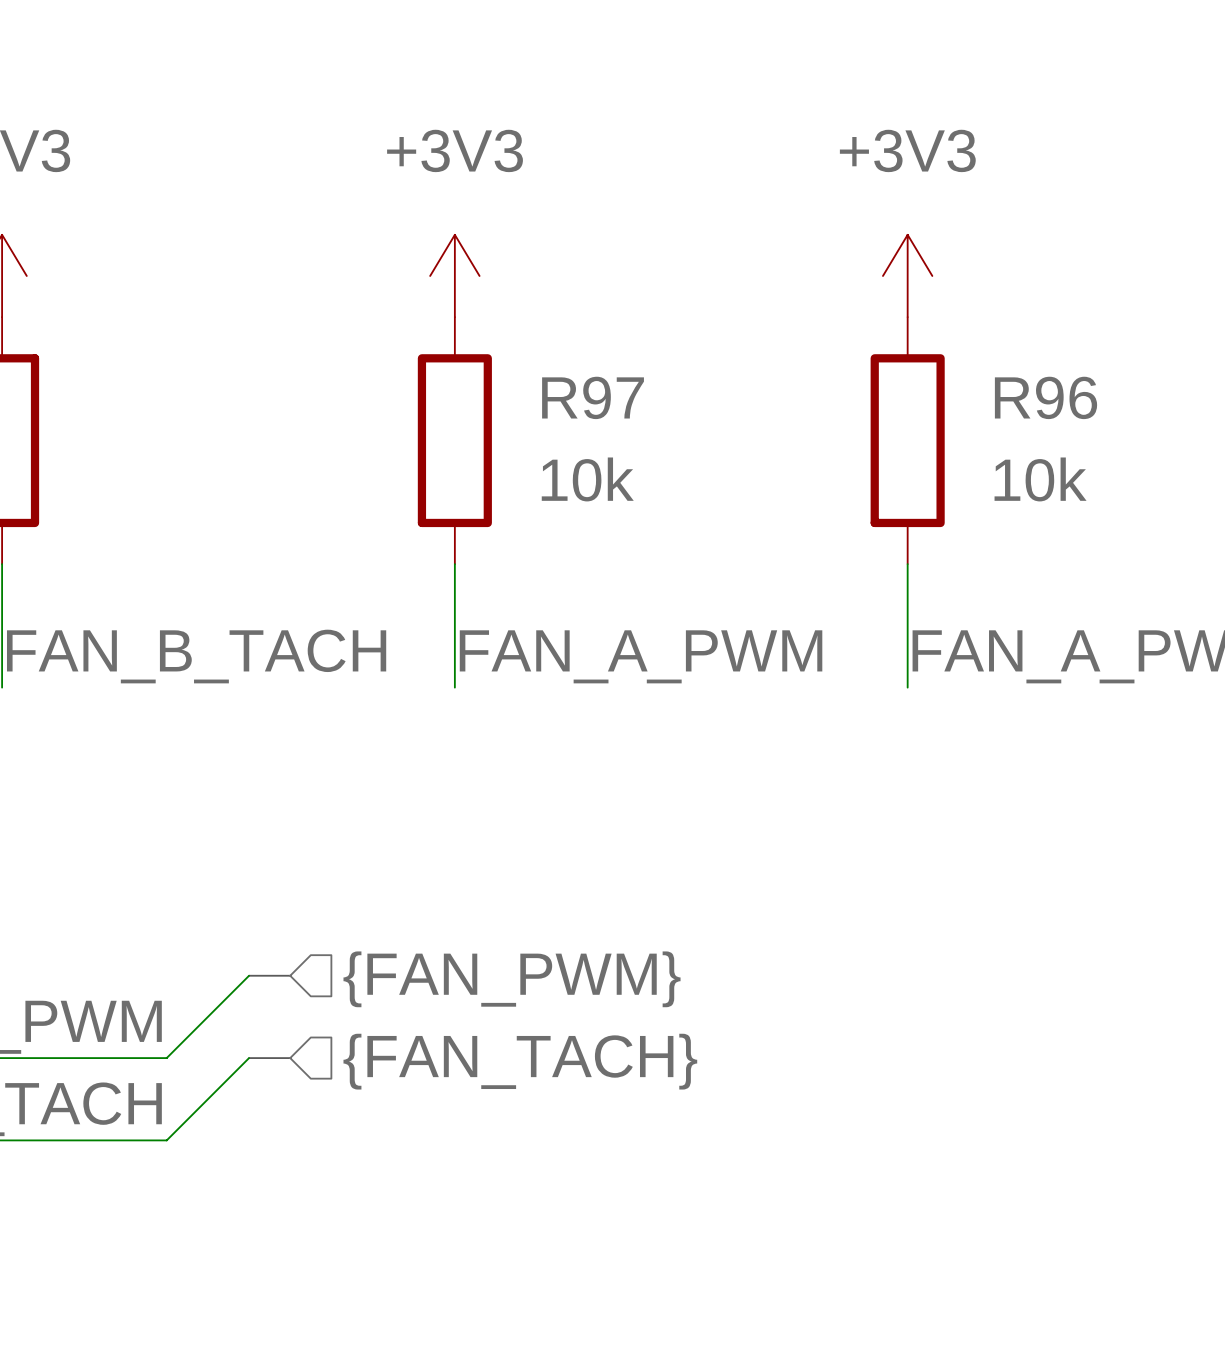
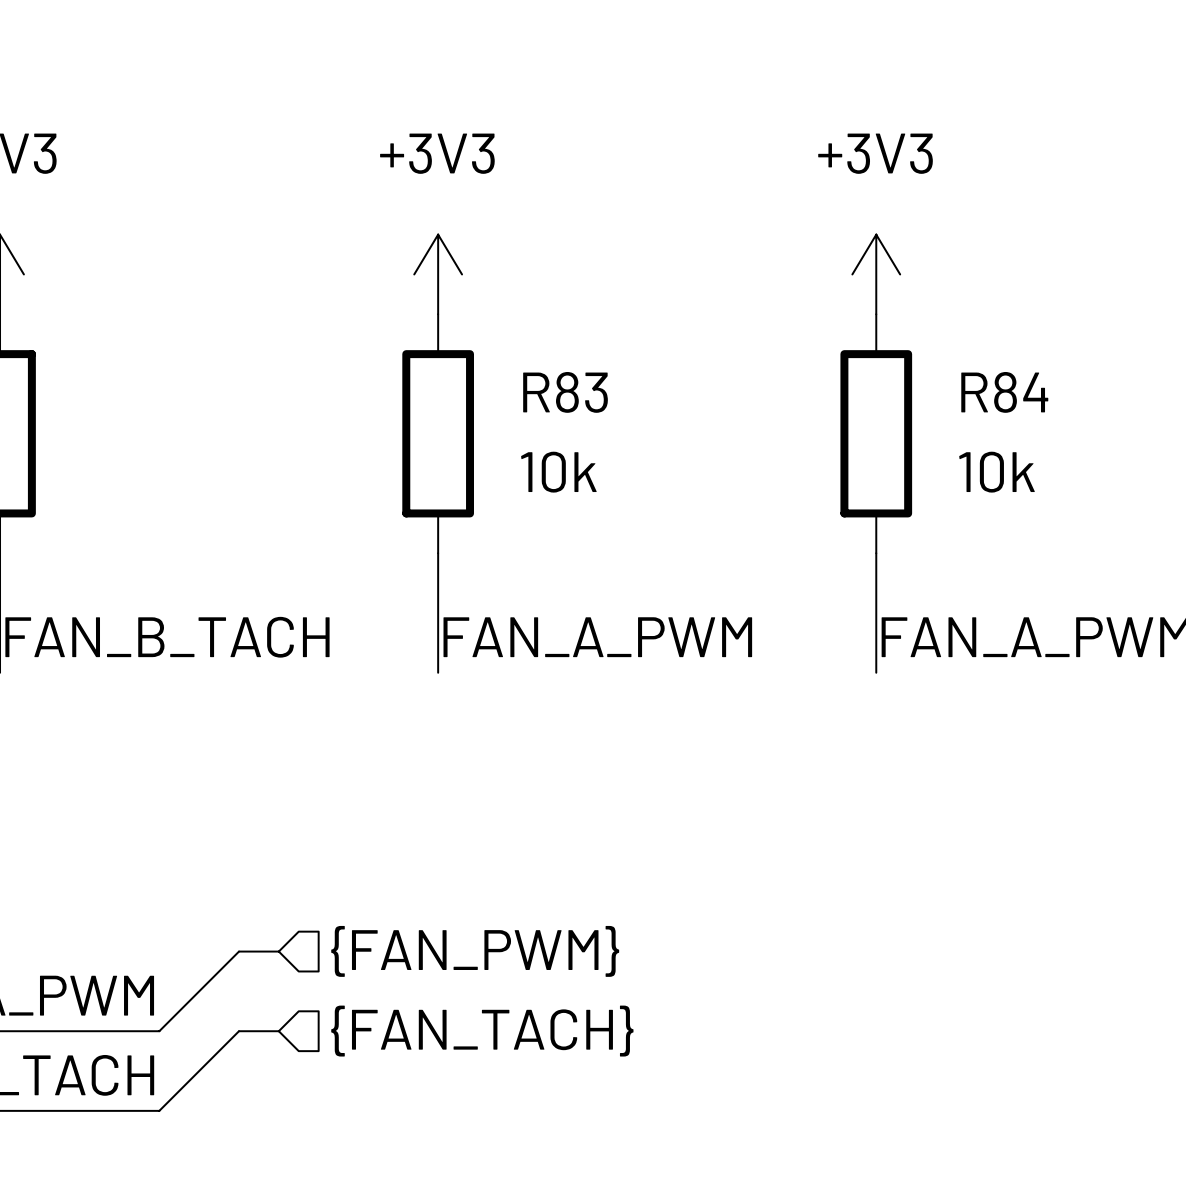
R97 name: R97 (593, 397) -> R83 (565, 392)
R96 name: R96 (1046, 397) -> R84 (1004, 392)

